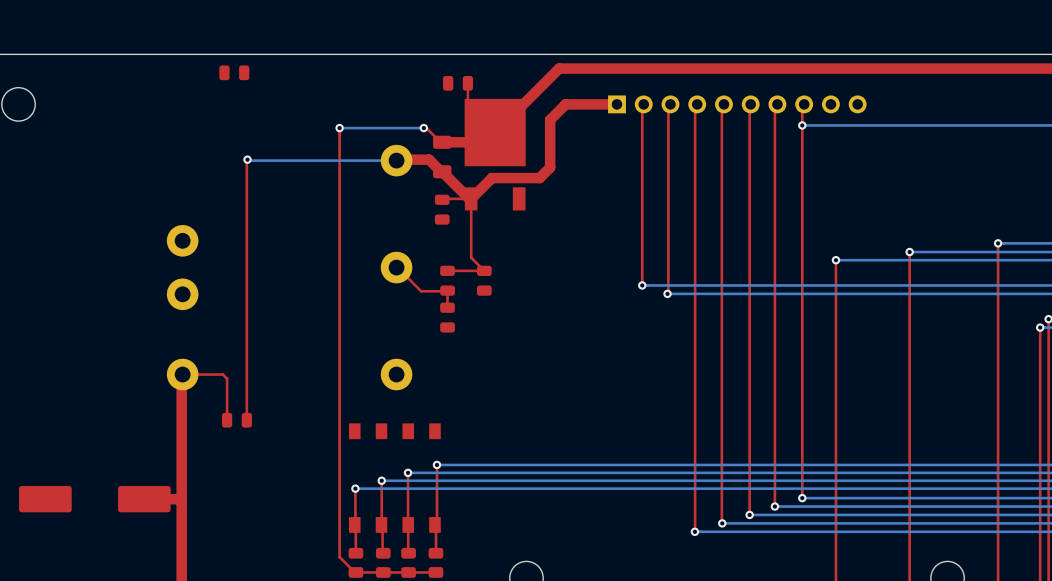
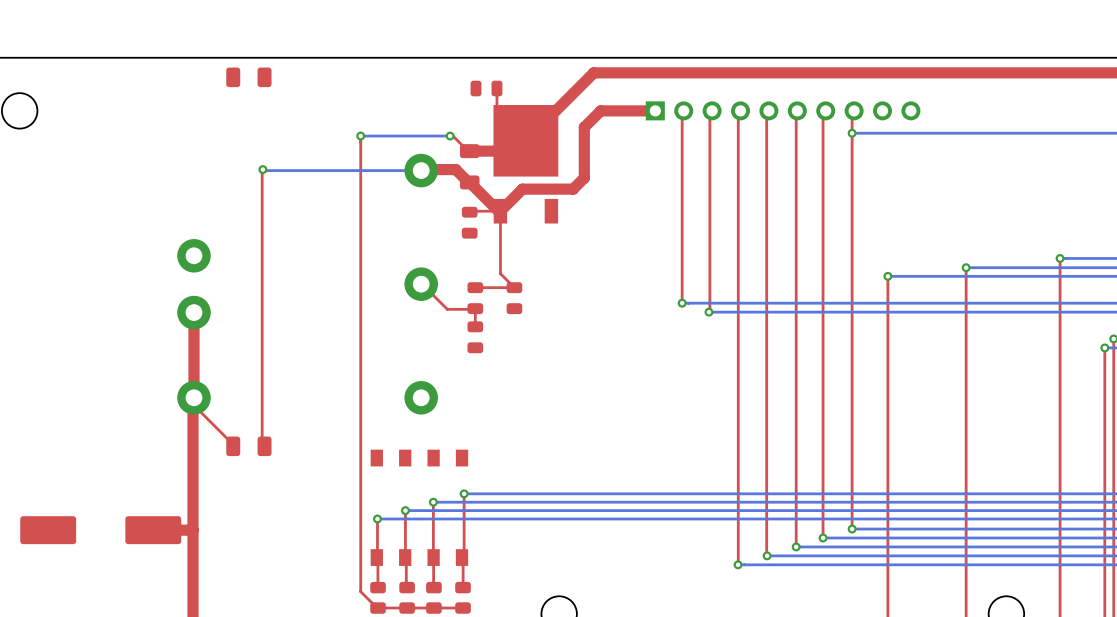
part footprint: [219, 65, 250, 81] -> [226, 67, 272, 88]
top track: none -> (193, 312) (193, 405) (233, 446)
top track: (182, 374) (222, 374) (227, 378) (227, 420) -> none
part footprint: [221, 412, 252, 428] -> [226, 436, 272, 457]

